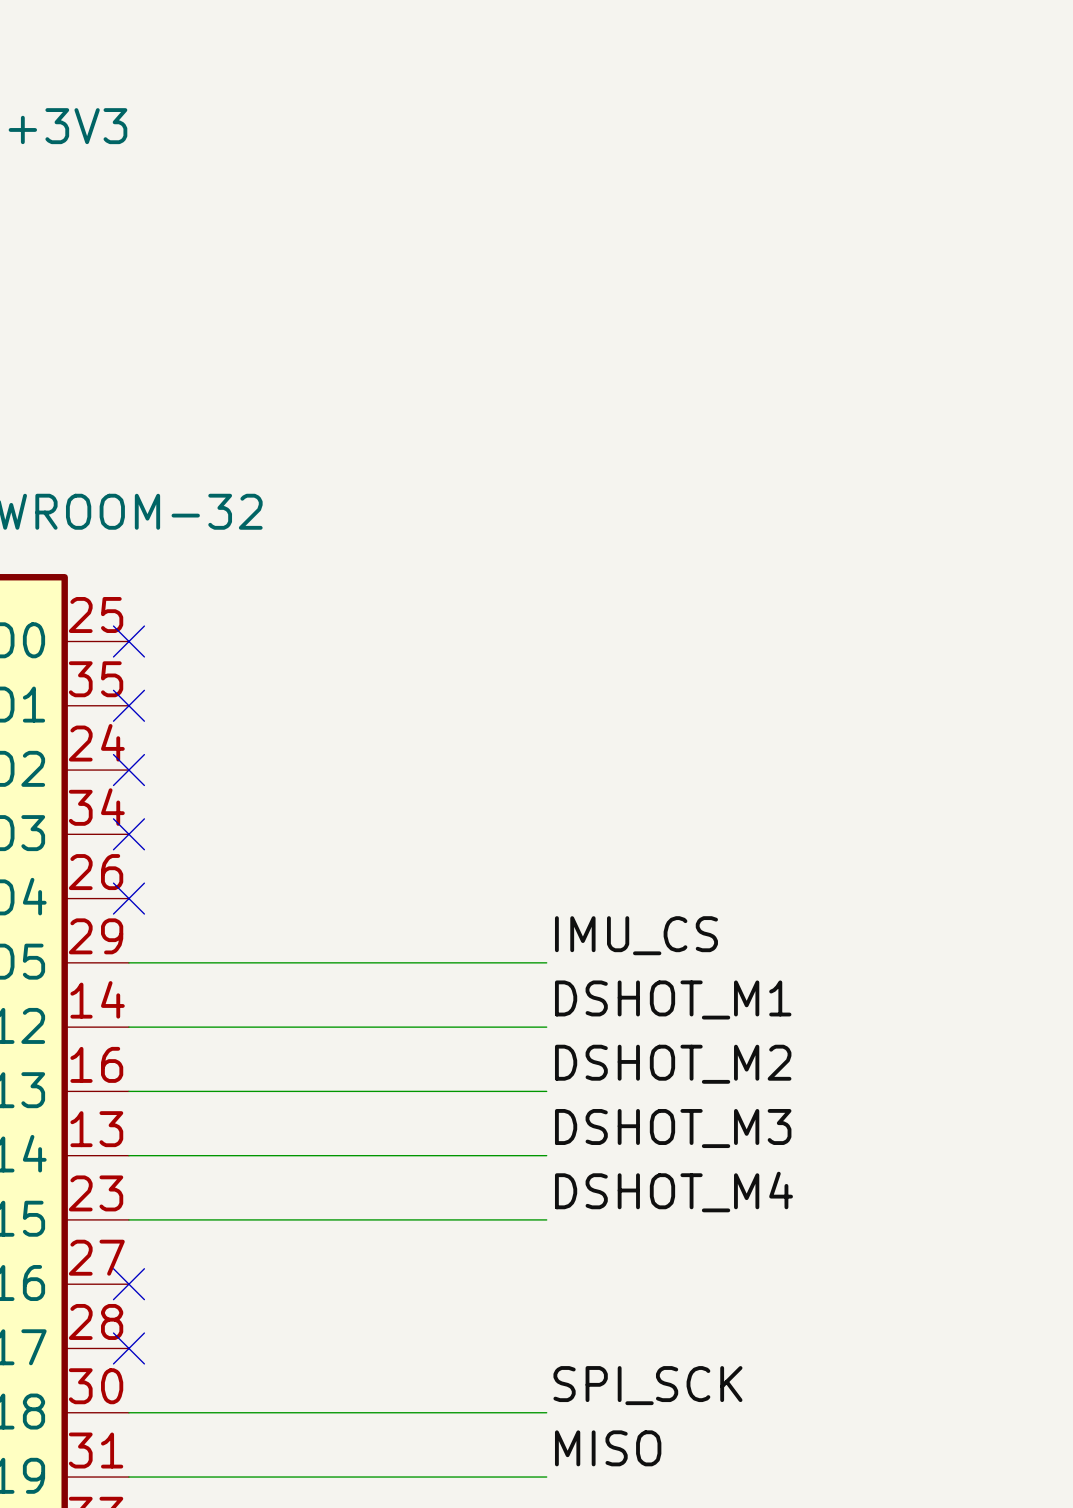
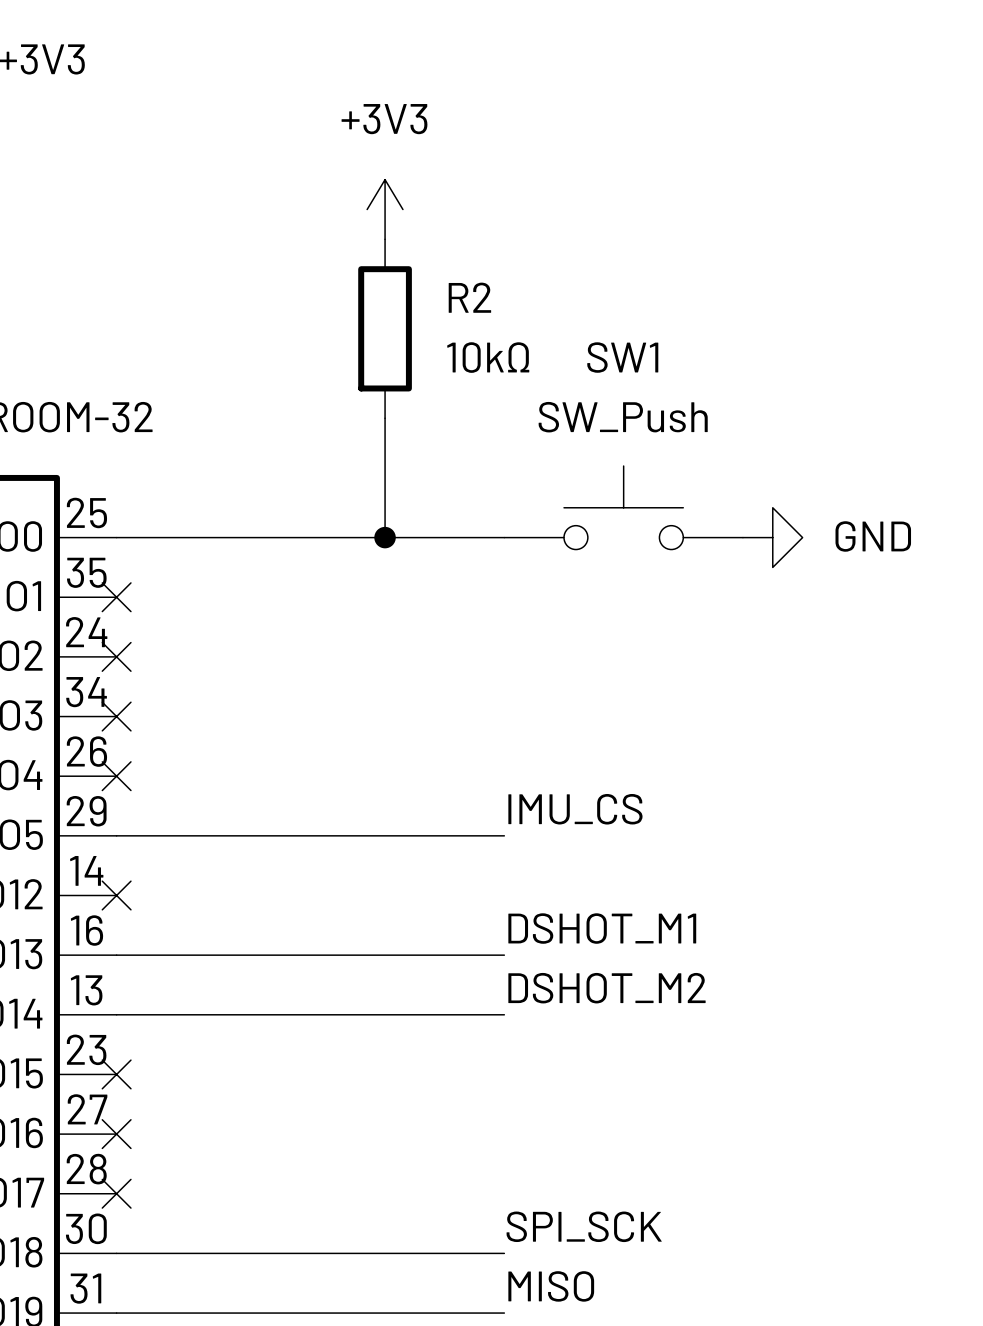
power symbol: none -> +3V3 (385, 209)
R2: none -> 10kΩ (385, 328)
wire: none -> (385, 418) (385, 537)
SW1: none -> SW_Push (623, 507)
no-connect mark: (128, 641) -> none
junction: none -> (385, 537)
power symbol: none -> GND (772, 537)
label: DSHOT_M1 (673, 999) -> none
wire: (128, 1027) (546, 1027) -> (116, 537) (504, 537)
no-connect mark: none -> (116, 895)
label: DSHOT_M2 (673, 1064) -> DSHOT_M1 (602, 928)
label: DSHOT_M3 (673, 1128) -> DSHOT_M2 (606, 988)
label: DSHOT_M4 (673, 1192) -> none
wire: (128, 1219) (546, 1219) -> none
no-connect mark: none -> (116, 1074)

